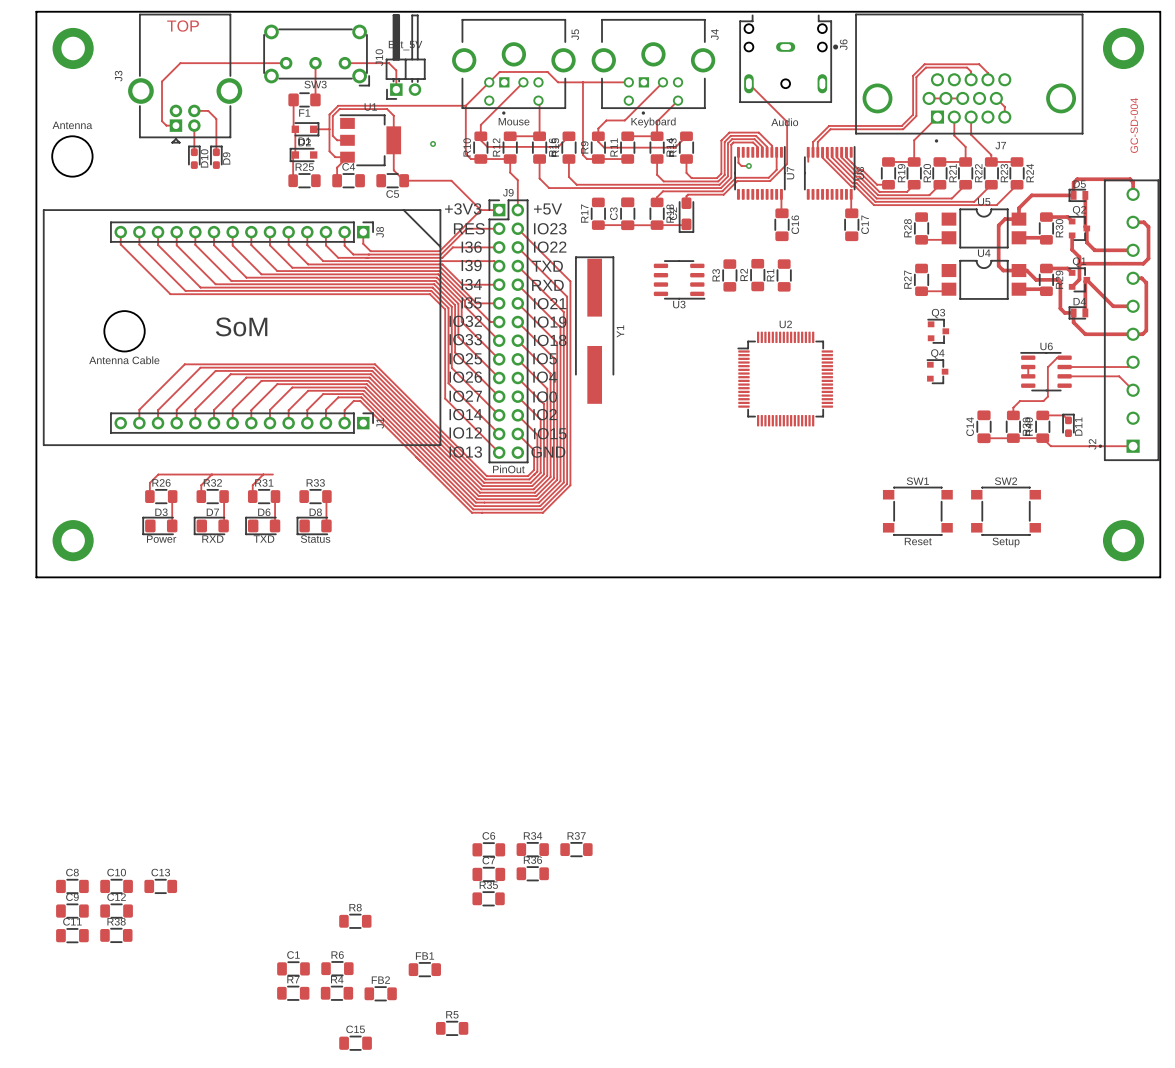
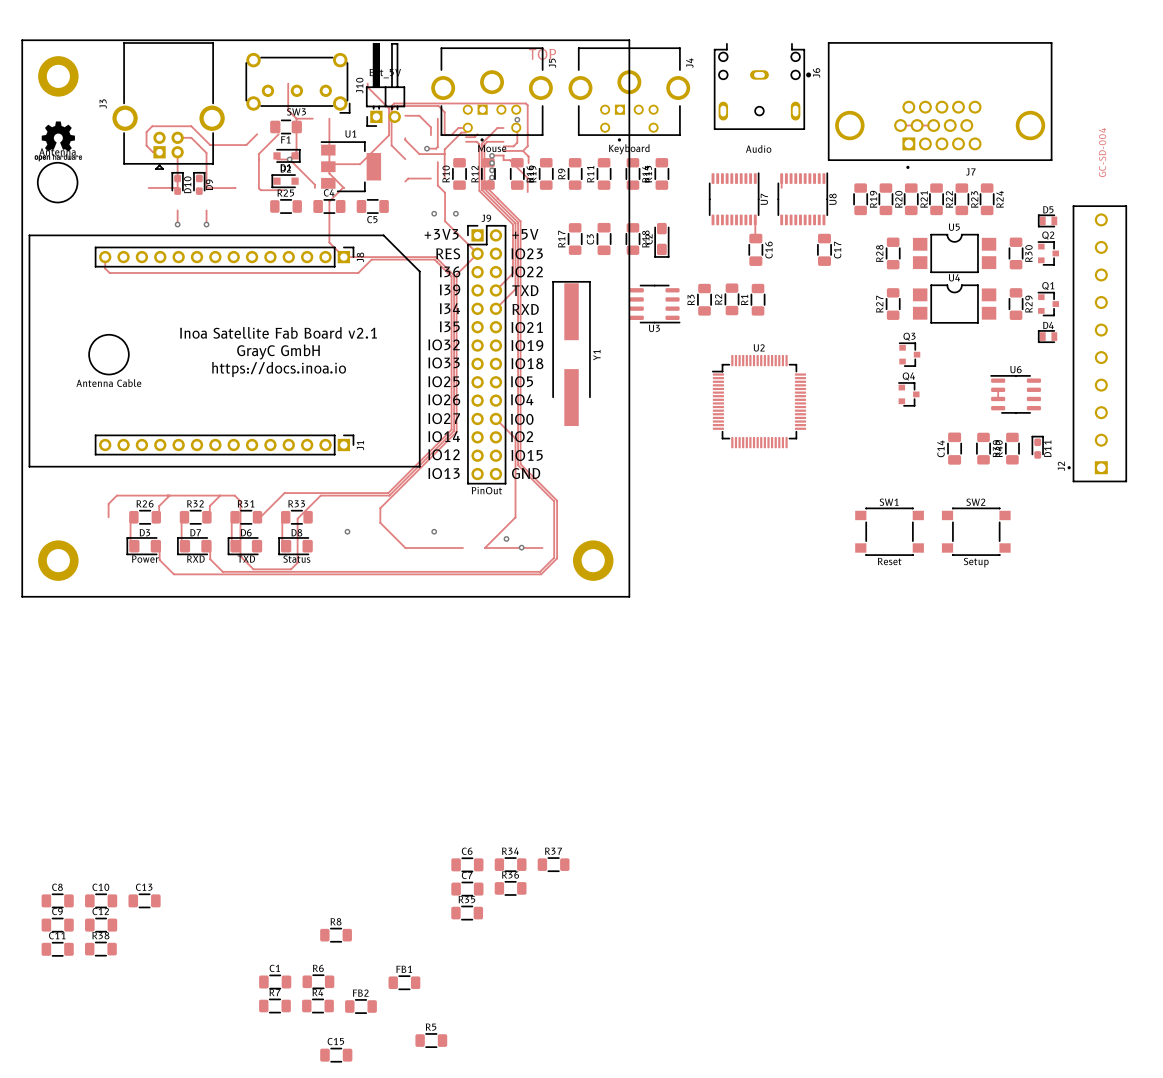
board edge: (653, 11) (1160, 11) (1160, 577) (653, 577) -> (629, 40) (629, 596)
text: TOP (183, 26) -> none
text: none -> TOP (542, 54)
part: (1123, 48) -> none
track: none -> (288, 83) (288, 110) (296, 118)
track: none -> (367, 83) (367, 87) (389, 108) (389, 135) (360, 164) (329, 164)
track: (286, 63) (180, 63) (162, 81) (162, 121) (166, 125) (169, 125) -> (257, 134) (246, 145) (210, 145) (191, 126) (152, 126) (146, 132) (146, 145) (153, 152)
track: (315, 63) (315, 99) -> none
track: (344, 63) (388, 63) (396, 70) (396, 89) -> none
track: (971, 79) (971, 71) (967, 67) (925, 67) (916, 77) (916, 116) (903, 129) (830, 129) (817, 141) (817, 152) -> none
track: (987, 79) (987, 73) (979, 64) (924, 64) (913, 75) (913, 114) (901, 125) (829, 125) (813, 142) (813, 152) -> none
track: none -> (389, 108) (394, 103) (525, 103) (527, 105) (527, 146) (522, 150)
track: (523, 82) (480, 124) (480, 140) (487, 146) (558, 146) (568, 136) -> none
track: (582, 82) (582, 155) (586, 159) (627, 159) -> none
track: (628, 82) (558, 82) (547, 71) (499, 71) (465, 105) (465, 153) (470, 159) (510, 159) (510, 172) (517, 180) (517, 210) -> none
track: (662, 82) (624, 120) (606, 120) (598, 128) (598, 141) (604, 147) (675, 147) (686, 136) -> none
track: (748, 83) (787, 121) (787, 164) (770, 181) (737, 181) (723, 194) (687, 194) (686, 203) -> none
track: none -> (405, 115) (419, 115) (430, 127) (430, 135)
track: none -> (296, 118) (296, 151) (288, 159) (277, 159)
track: none -> (296, 118) (312, 118)
track: none -> (437, 118) (437, 146) (426, 148)
via: none -> (517, 119)
drawing: none -> [34, 121, 83, 162]
track: (996, 98) (1004, 106) (1004, 117) -> none
track: (293, 99) (295, 154) (293, 157) (293, 180) -> none
track: none -> (466, 128) (458, 128) (451, 135) (444, 135) (444, 112) (438, 106) (395, 106) (391, 109) (391, 145) (405, 159)
track: (678, 100) (657, 121) (657, 136) (627, 136) -> none
track: (466, 105) (338, 105) (329, 114) (329, 151) (335, 157) (347, 157) (337, 167) (337, 180) -> none
track: none -> (466, 132) (461, 132) (444, 149) (444, 178)
track: none -> (278, 134) (258, 153) (258, 188) (260, 190) (283, 190)
track: none -> (477, 134) (474, 137) (466, 137)
track: none -> (405, 138) (419, 154) (444, 154)
track: none -> (503, 141) (487, 141) (484, 144) (484, 188) (518, 222) (518, 465) (554, 501) (554, 557) (540, 571) (222, 571) (210, 559) (210, 546)
track: (539, 115) (539, 136) (510, 136) -> (517, 142) (513, 146) (503, 146)
track: (937, 117) (914, 140) (914, 161) (888, 161) -> none
track: (954, 117) (954, 135) (965, 146) (965, 161) (939, 161) -> none
track: (971, 117) (971, 134) (991, 154) (991, 161) (1017, 161) -> none
track: (216, 119) (216, 152) -> (199, 145) (206, 152) (206, 188) (235, 188)
via: none -> (426, 148)
track: none -> (503, 150) (522, 150)
track: none -> (522, 150) (528, 156) (528, 163)
track: (313, 129) (329, 129) -> none
track: none -> (492, 155) (503, 155) (503, 160) (509, 160) (527, 178) (527, 192)
via: none -> (492, 155)
track: none -> (289, 159) (314, 184) (314, 187)
via: none -> (289, 159)
track: none -> (437, 162) (437, 185) (445, 192) (445, 221) (477, 253) (456, 274) (456, 431) (380, 508) (380, 522) (405, 547) (462, 547)
via: none -> (492, 163)
track: (347, 140) (337, 140) (332, 135) (332, 115) (339, 109) (387, 109) (393, 115) (393, 170) (404, 180) (451, 180) (480, 210) -> none
via: (433, 143) -> none
via: none -> (492, 170)
track: none -> (492, 177) (486, 182) (486, 187) (497, 198)
via: none -> (492, 177)
track: none -> (177, 178) (177, 188)
track: none -> (430, 178) (408, 178) (405, 181)
track: (738, 152) (738, 162) (741, 166) (748, 166) -> none
track: (757, 152) (757, 146) (753, 142) (733, 142) (731, 144) (731, 177) (721, 188) (549, 188) (539, 178) (539, 159) -> none
track: (762, 152) (762, 146) (754, 139) (732, 139) (727, 143) (727, 176) (719, 184) (576, 184) (568, 177) (568, 159) -> none
track: (767, 152) (767, 146) (756, 135) (730, 135) (724, 141) (724, 175) (718, 181) (663, 181) (657, 174) (657, 159) -> none
track: (771, 152) (771, 145) (758, 132) (729, 132) (721, 140) (721, 173) (716, 178) (691, 178) (686, 172) (686, 159) -> none
track: (776, 152) (776, 169) (768, 177) (735, 177) (722, 191) (662, 191) (657, 197) (657, 202) -> none
track: (822, 152) (822, 157) (851, 186) (855, 186) (874, 205) (996, 205) (1017, 184) -> none
track: (827, 152) (827, 157) (852, 183) (856, 183) (875, 201) (974, 201) (991, 184) -> none
track: (832, 152) (832, 157) (876, 198) (951, 198) (965, 184) -> none
track: (836, 152) (836, 157) (878, 195) (929, 195) (939, 184) -> none
track: (841, 152) (841, 157) (879, 191) (907, 191) (914, 184) -> none
track: (846, 152) (846, 157) (851, 162) -> none
track: none -> (148, 187) (177, 187)
track: (851, 162) (877, 184) (888, 184) -> none
via: (748, 166) -> none
track: none -> (497, 198) (520, 221) (520, 464) (557, 500) (557, 558) (541, 574) (174, 574) (159, 560) (159, 546)
track: none -> (177, 210) (177, 224)
track: none -> (206, 210) (206, 224)
via: none -> (434, 213)
via: none -> (455, 213)
track: (851, 194) (851, 213) -> none
track: (1133, 194) (1133, 182) (1130, 179) (1077, 179) (1073, 182) (1073, 195) (1031, 195) (1018, 208) (1018, 219) (1005, 219) (998, 225) (998, 265) (1003, 270) (1026, 270) (1036, 279) (1057, 279) (1060, 282) (1060, 308) (1064, 312) (1073, 312) (1073, 322) (1085, 334) (1142, 334) (1146, 330) (1146, 282) (1141, 278) (1133, 278) -> none
track: (1085, 195) (1086, 242) (1094, 250) (1133, 250) -> none
via: none -> (177, 224)
via: none -> (206, 224)
line: (403, 210) (440, 210) (440, 246) -> none
track: (480, 210) (499, 210) -> none
track: (480, 210) (439, 251) (370, 251) (363, 243) (363, 232) -> none
track: (1046, 217) (1067, 217) (1072, 221) -> none
track: (1133, 222) (1143, 222) (1148, 226) (1148, 258) (1143, 263) (1079, 263) -> none
track: (686, 224) (657, 225) -> none
track: (598, 225) (627, 225) -> none
track: (627, 225) (657, 225) -> none
track: (499, 228) (466, 228) (441, 254) (353, 254) (344, 245) (344, 232) -> none
track: (517, 228) (570, 281) (570, 485) (542, 512) (471, 512) (360, 401) (353, 401) (344, 410) (344, 423) -> none
track: (139, 232) (139, 244) (185, 290) (431, 290) (448, 308) (448, 383) (499, 433) -> none
track: (158, 232) (158, 245) (200, 287) (432, 287) (451, 306) (451, 367) (499, 415) -> none
track: (176, 232) (176, 245) (215, 284) (434, 284) (455, 305) (455, 352) (499, 396) -> none
track: (195, 232) (195, 244) (231, 280) (435, 280) (458, 303) (458, 337) (499, 378) -> none
track: (214, 232) (214, 245) (246, 277) (436, 277) (461, 302) (461, 321) (499, 359) -> none
track: (232, 232) (232, 245) (261, 274) (438, 274) (465, 301) (465, 306) (499, 340) -> none
track: (251, 232) (251, 245) (277, 271) (439, 271) (490, 322) (499, 322) -> none
track: (269, 232) (269, 245) (292, 267) (441, 267) (476, 303) (499, 303) -> none
track: (288, 232) (288, 244) (308, 264) (442, 264) (462, 284) (499, 284) -> none
track: (307, 232) (307, 245) (323, 261) (494, 261) (498, 267) -> none
track: (325, 232) (325, 245) (338, 257) (442, 257) (452, 247) (499, 247) -> none
track: (1072, 235) (1072, 249) (1079, 257) (1079, 279) (1072, 286) -> none
track: (948, 237) (946, 239) (921, 239) -> none
track: (1018, 237) (1044, 237) (1046, 239) -> none
track: (120, 243) (170, 294) (429, 294) (445, 309) (445, 398) (499, 452) -> (105, 268) (109, 272) (358, 272) (371, 259) (434, 259) (451, 276) (451, 429) (388, 493) (284, 493) (260, 517)
track: (517, 247) (567, 296) (567, 483) (541, 509) (473, 509) (361, 397) (338, 397) (325, 409) (325, 423) -> none
track: (517, 266) (563, 312) (563, 482) (540, 506) (474, 506) (362, 394) (323, 394) (307, 410) (307, 423) -> (495, 290) (512, 273) (512, 224) (479, 190) (479, 144) (476, 141) (466, 141)
track: (1046, 268) (1067, 268) (1072, 272) -> none
track: (517, 284) (560, 327) (560, 481) (539, 502) (475, 502) (364, 390) (308, 390) (288, 410) (288, 423) -> (495, 308) (515, 289) (515, 223) (481, 189) (481, 143) (497, 128) (503, 128)
track: (948, 289) (946, 291) (921, 291) -> none
track: (1018, 289) (1044, 289) (1046, 291) -> none
track: (517, 303) (557, 342) (557, 479) (537, 499) (477, 499) (365, 387) (292, 387) (269, 409) (269, 423) -> none
track: (1133, 306) (1113, 306) (1086, 279) (1085, 312) -> none
text: none -> Inoa Satellite Fab Board v2.1 (278, 332)
track: (517, 322) (553, 358) (553, 478) (536, 495) (478, 495) (366, 384) (277, 384) (251, 410) (251, 423) -> none
text: SoM (241, 326) -> none
text: none -> GrayC GmbH (278, 351)
track: (517, 340) (550, 373) (550, 477) (535, 492) (479, 492) (368, 380) (261, 380) (232, 409) (232, 423) -> none
text: none -> https://docs.inoa.io (279, 369)
track: (1064, 357) (1057, 357) (1047, 367) (1047, 396) (1043, 401) (1019, 401) (1013, 407) (1013, 415) -> none
track: (517, 359) (547, 388) (547, 475) (533, 489) (481, 489) (369, 377) (246, 377) (214, 410) (214, 423) -> none
track: (1133, 362) (1128, 367) (1064, 367) -> none
track: (1064, 376) (1119, 376) (1133, 390) -> none
track: (517, 378) (543, 404) (543, 474) (532, 486) (482, 486) (370, 374) (230, 374) (195, 409) (195, 423) -> none
track: (517, 415) (537, 434) (537, 471) (529, 479) (485, 479) (373, 367) (200, 367) (158, 410) (158, 423) -> none
track: (1042, 415) (1063, 415) (1068, 420) -> none
track: (537, 416) (540, 419) (540, 472) (530, 482) (484, 482) (372, 370) (215, 370) (176, 409) (176, 423) -> (515, 438) (515, 517) (484, 547) (542, 547)
track: (139, 423) (139, 409) (184, 364) (375, 364) (486, 476) (527, 476) (534, 470) (534, 450) (517, 433) -> none
track: (983, 438) (1013, 438) -> none
track: (1013, 438) (1042, 438) (1050, 446) (1133, 446) -> none
track: (158, 474) (149, 482) (149, 496) -> (142, 495) (116, 495) (108, 503) (108, 517)
track: (211, 474) (201, 485) (201, 496) -> (169, 495) (159, 506) (159, 517)
track: (252, 474) (272, 474) -> (234, 495) (240, 501) (240, 556) (253, 569) (291, 569) (297, 562) (297, 518) (320, 495) (389, 495) (454, 430) (454, 275) (435, 257) (343, 257) (329, 242) (329, 201) (343, 187) (329, 173) (329, 118)
track: (263, 474) (252, 485) (252, 496) -> (220, 495) (209, 506) (209, 517)
track: (172, 496) (172, 525) -> (131, 517) (130, 546)
track: (224, 496) (223, 525) -> (181, 517) (181, 546)
track: (275, 496) (275, 525) -> (232, 517) (231, 546)
track: (326, 496) (326, 525) -> (282, 517) (282, 546)
via: none -> (347, 531)
via: none -> (434, 531)
via: none -> (506, 538)
via: none -> (521, 547)
part: none -> (593, 560)
part: (1123, 540) -> none

